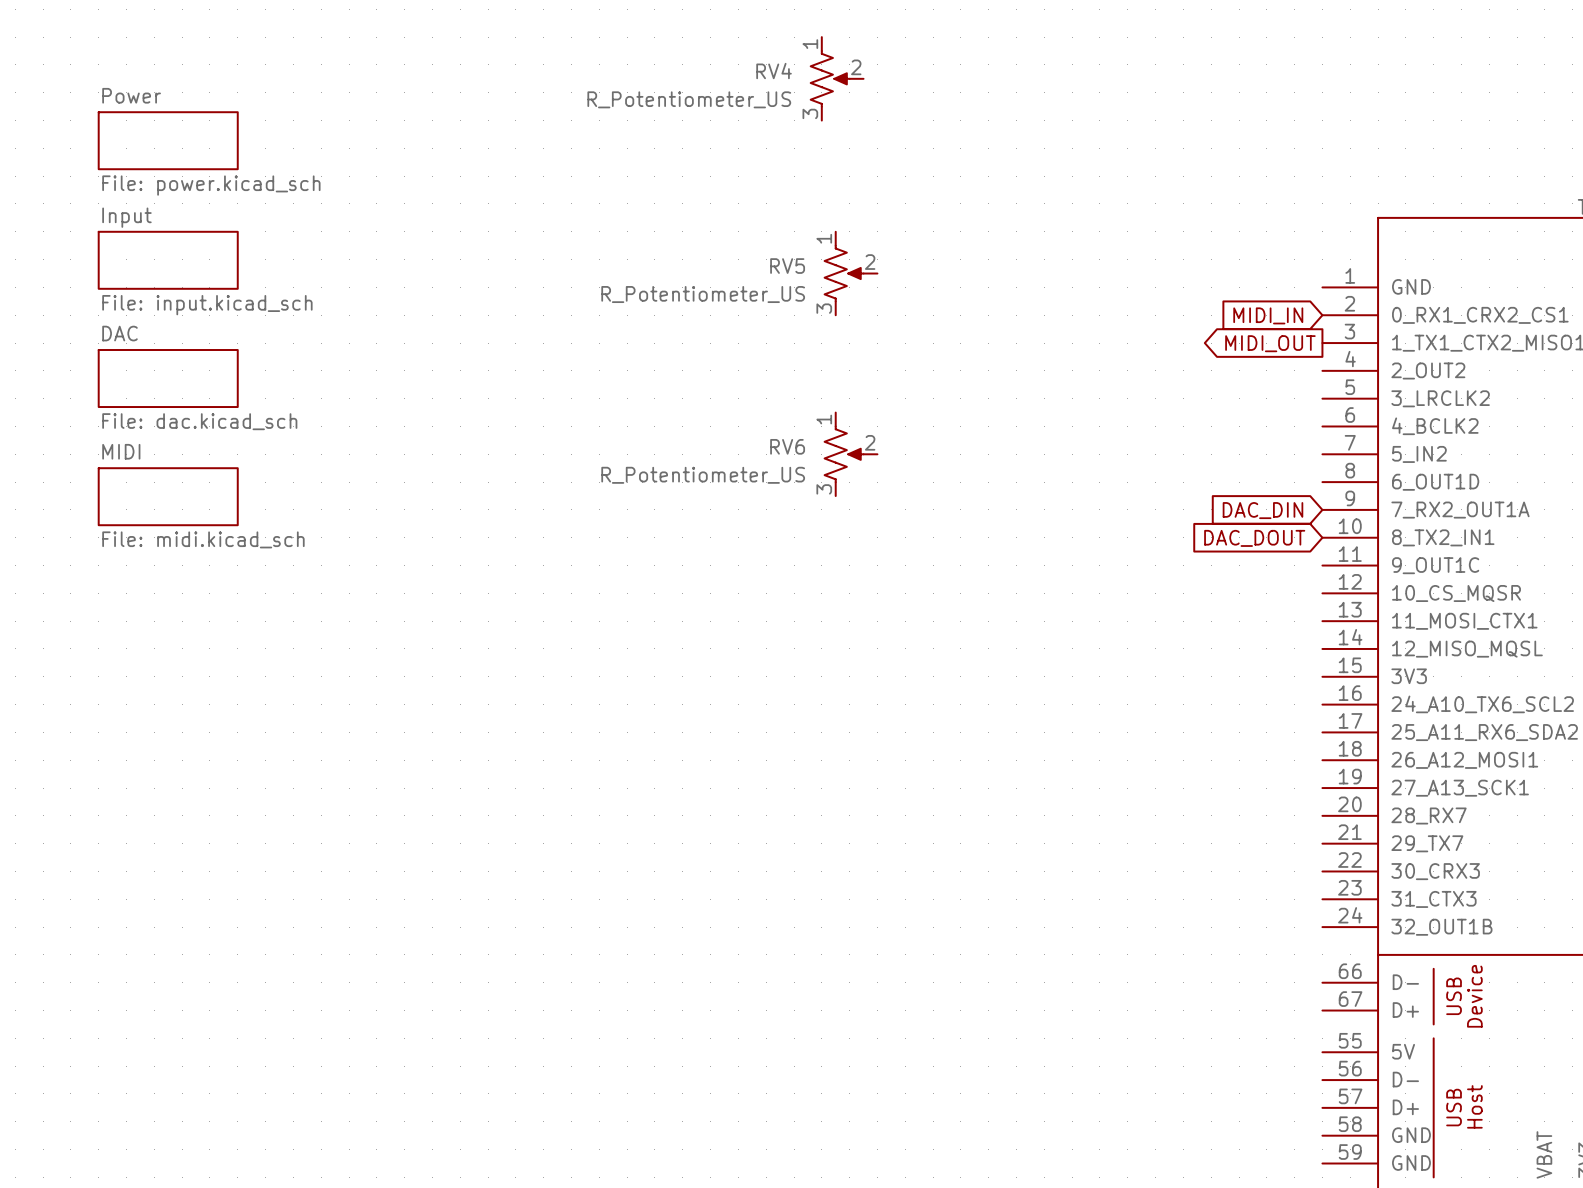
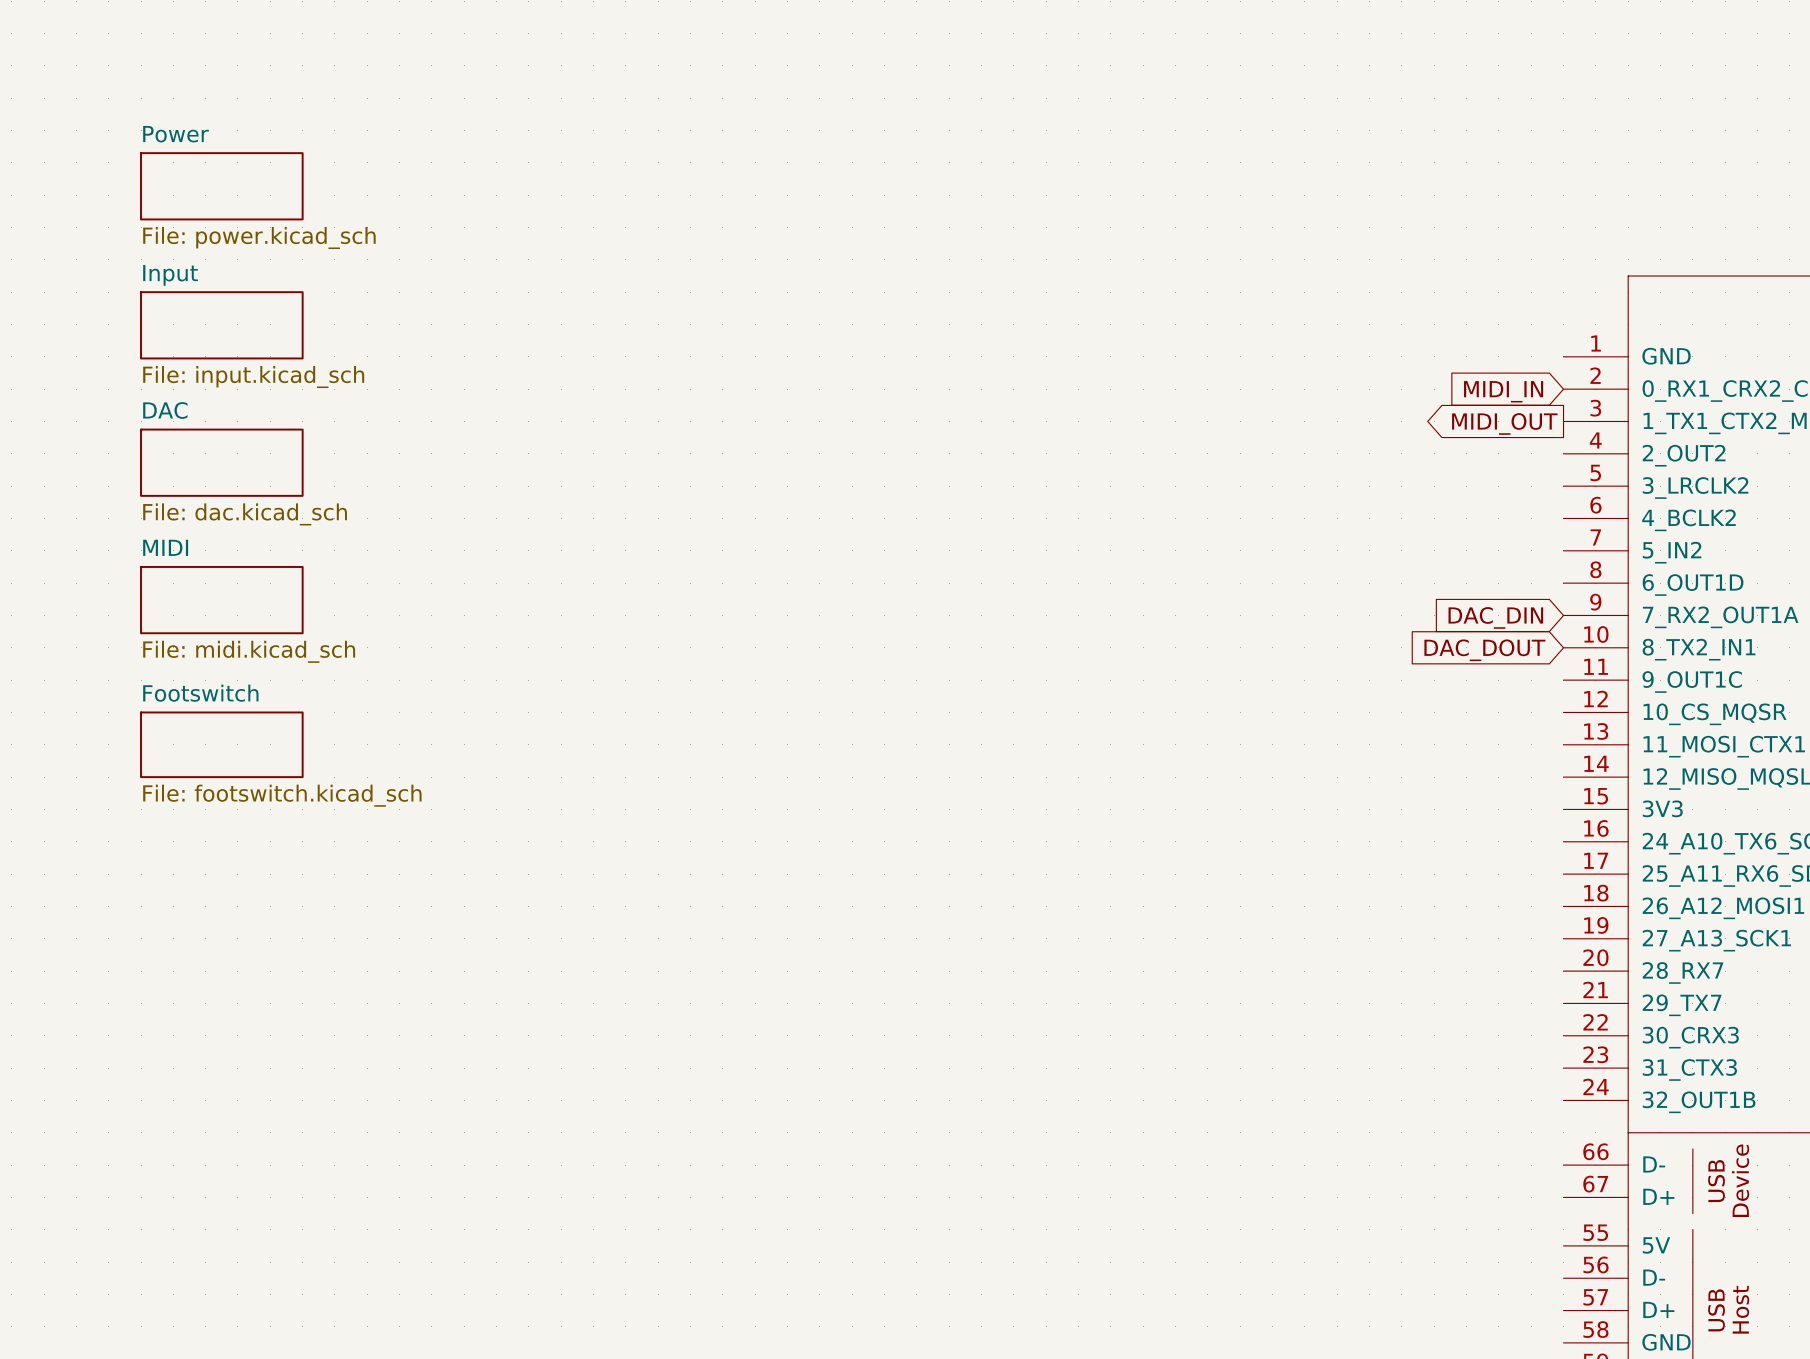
RV4: R_Potentiometer_US (837, 78) -> none
RV5: R_Potentiometer_US (851, 273) -> none
RV6: R_Potentiometer_US (851, 454) -> none
sheet Footswitch: none -> File: footswitch.kicad_sch (221, 744)

